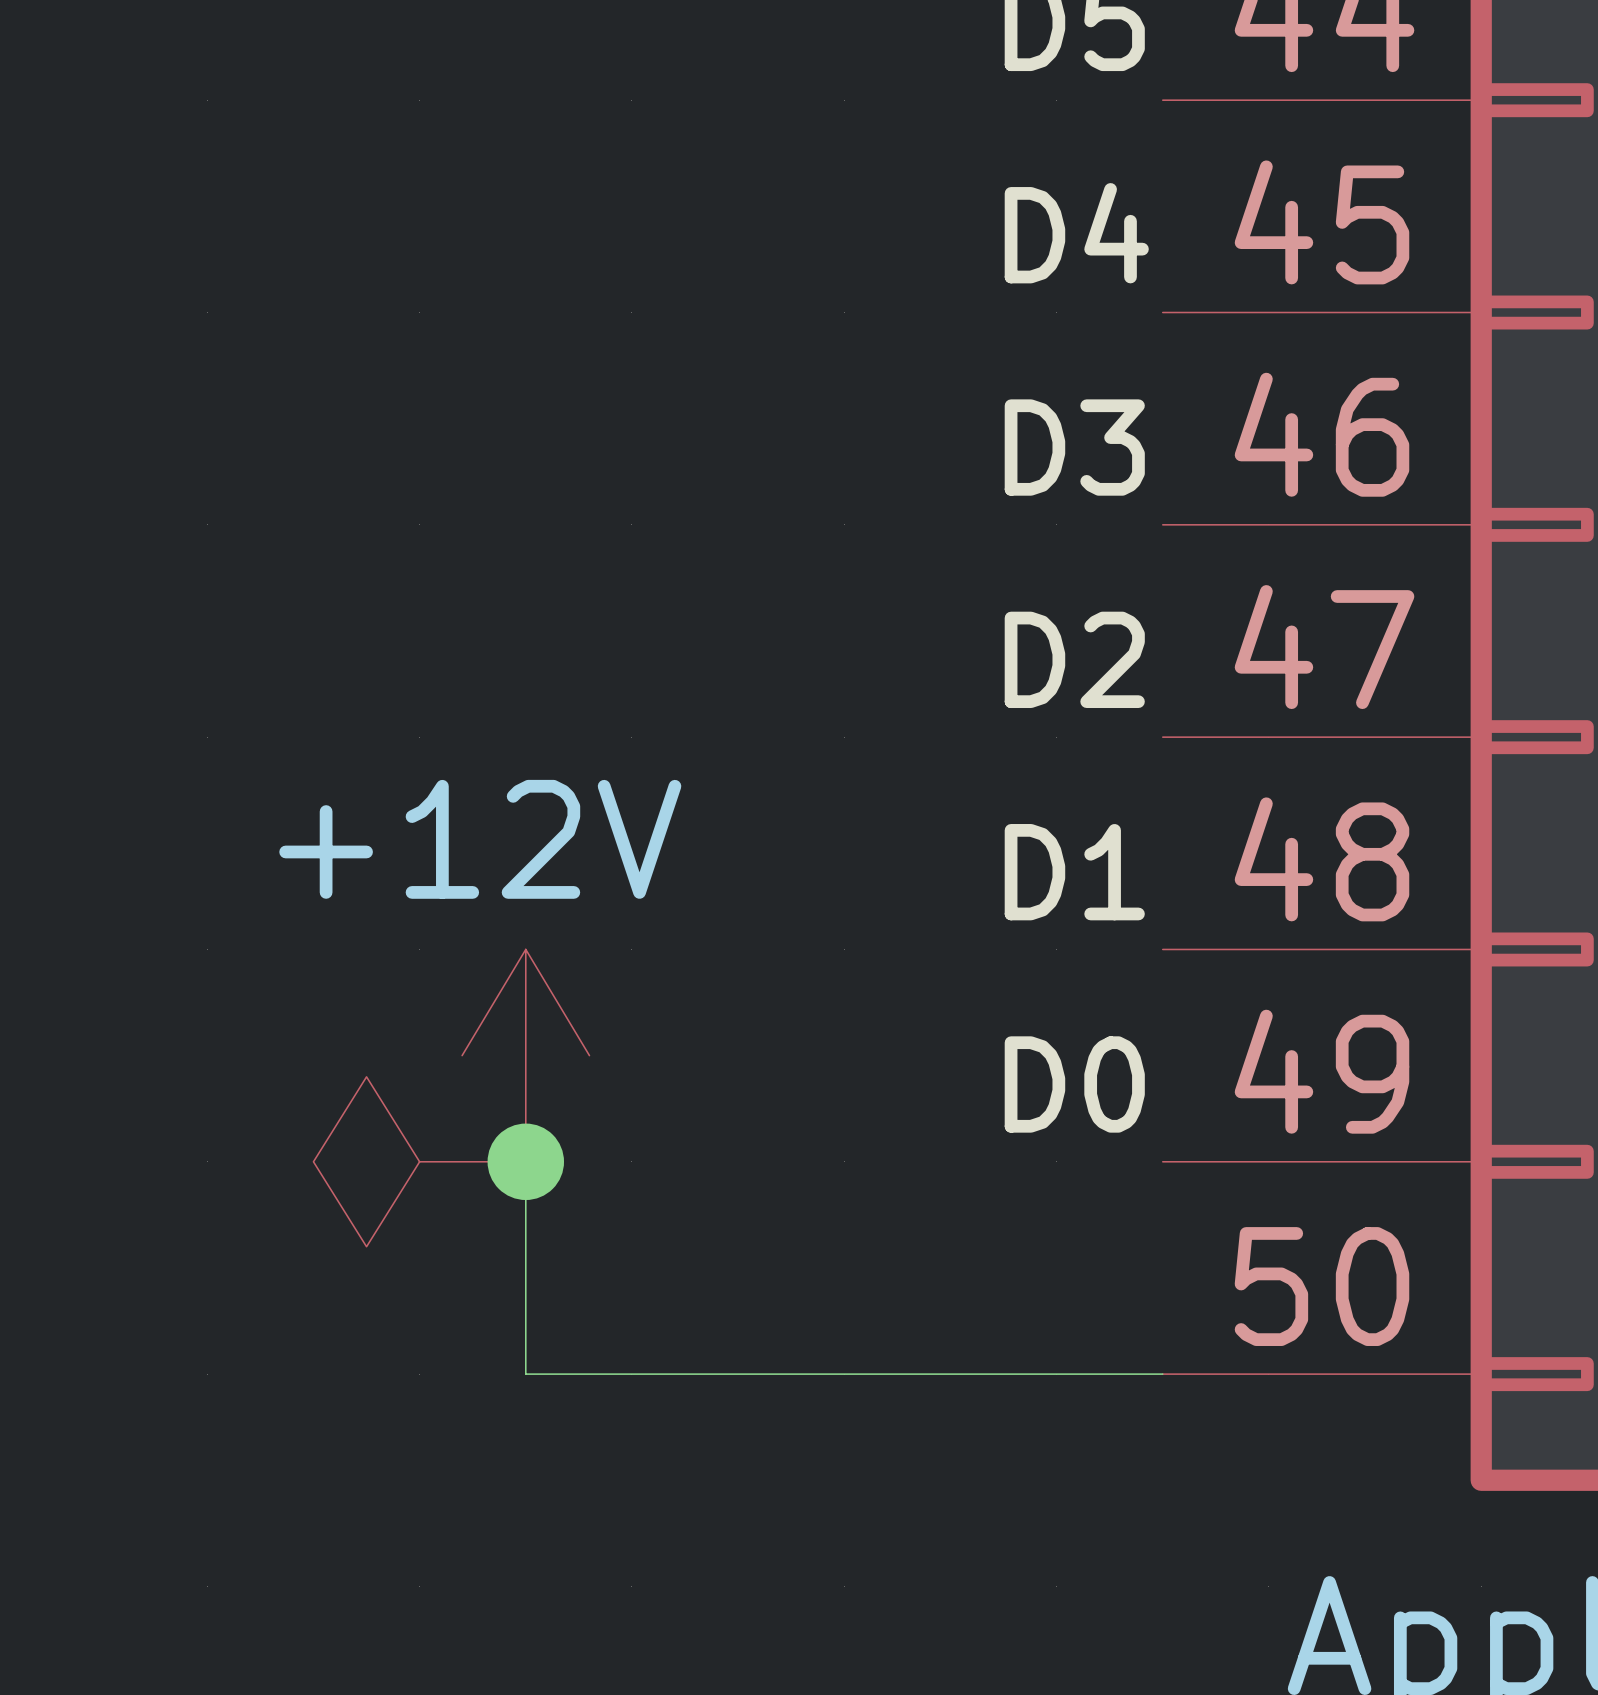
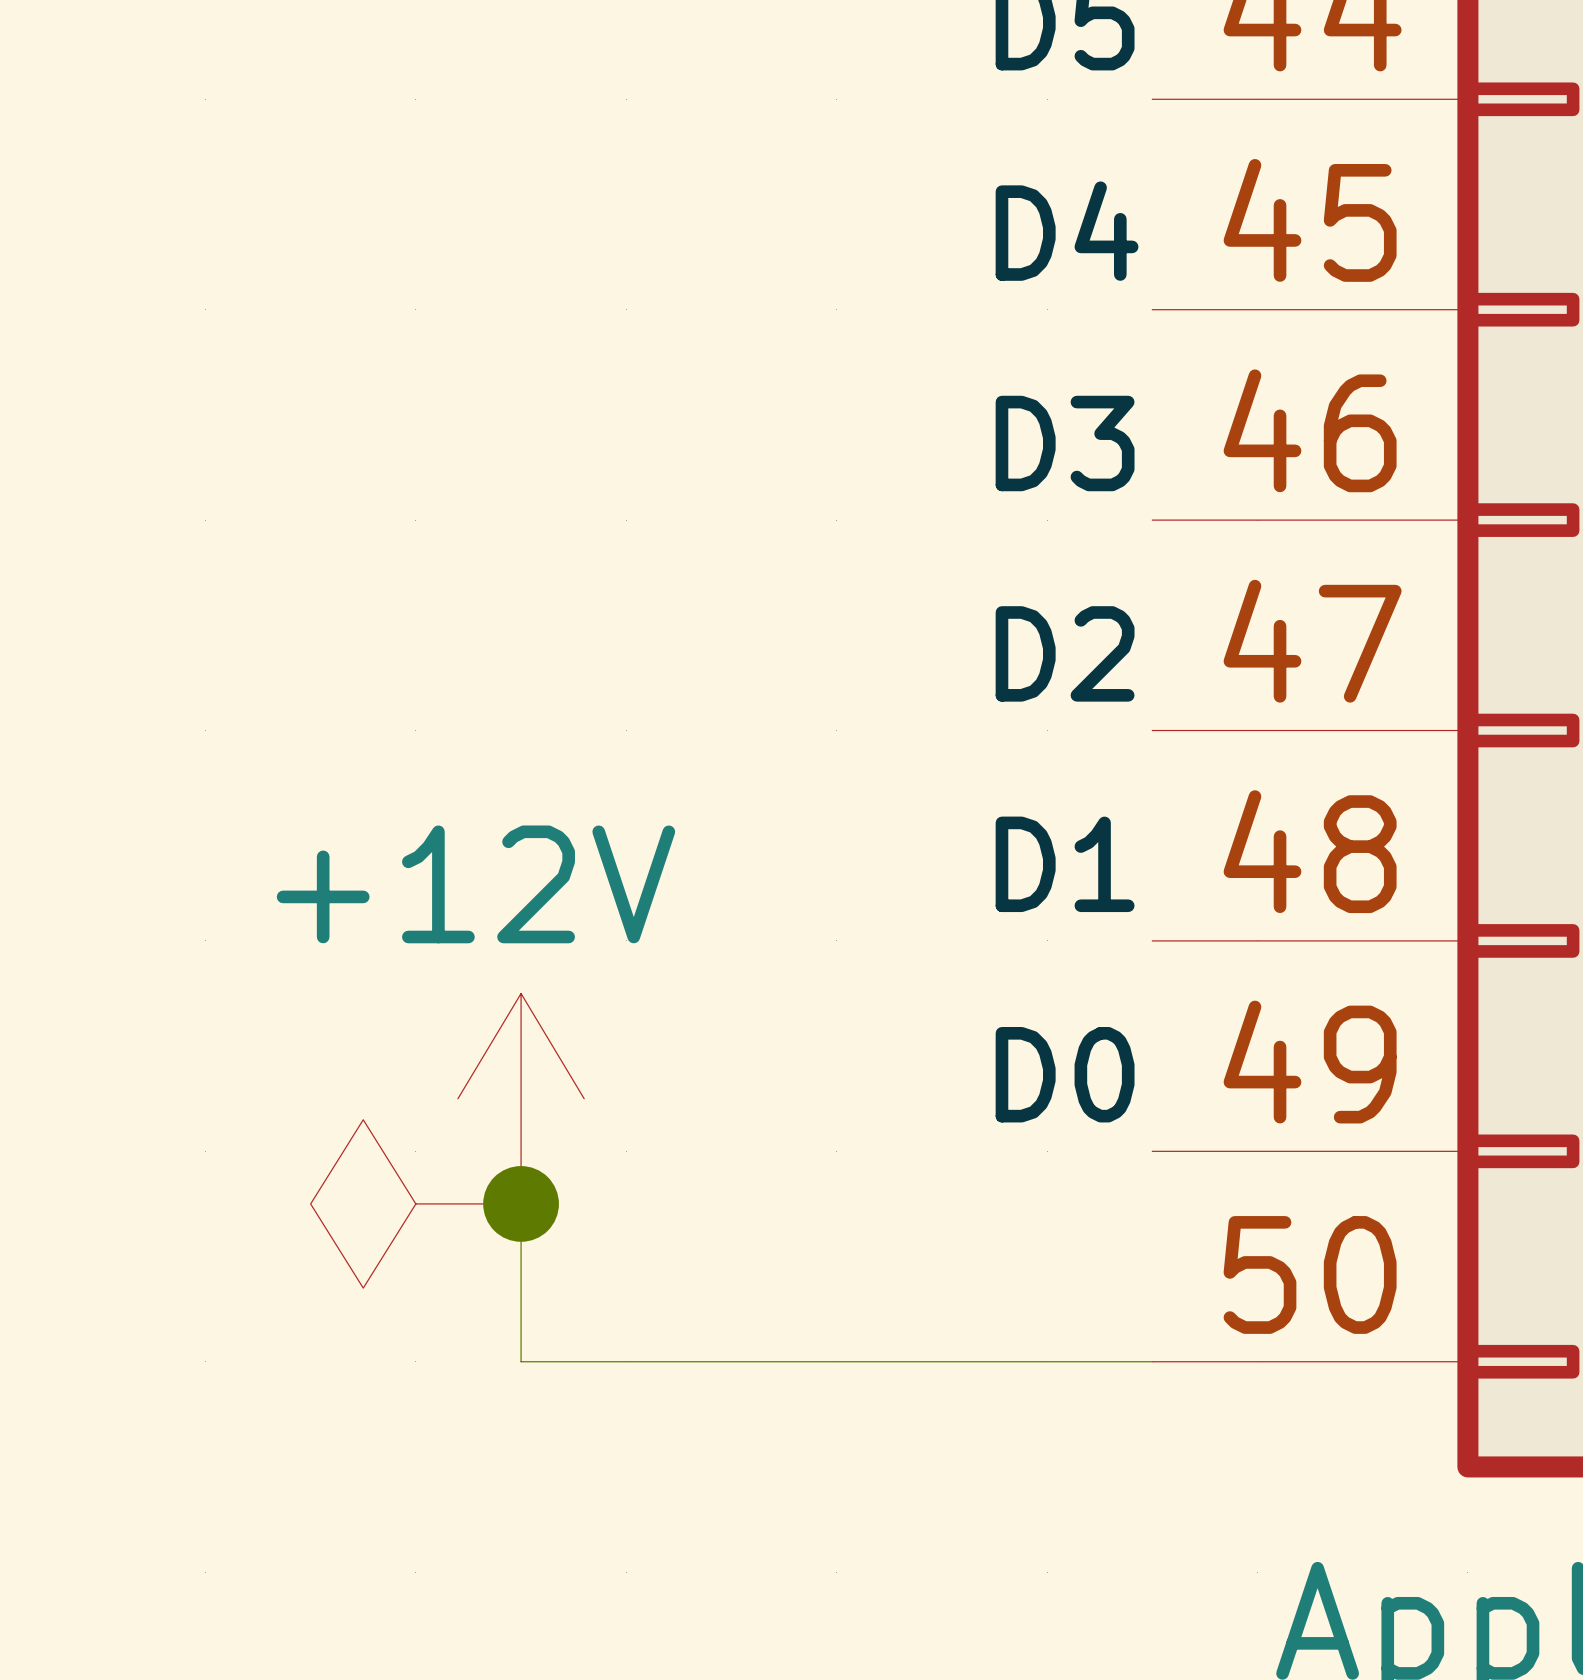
power symbol position: +12V (525, 1055) -> +12V (521, 1098)
power symbol position: (419, 1161) -> (415, 1203)
junction position: (525, 1161) -> (521, 1203)

